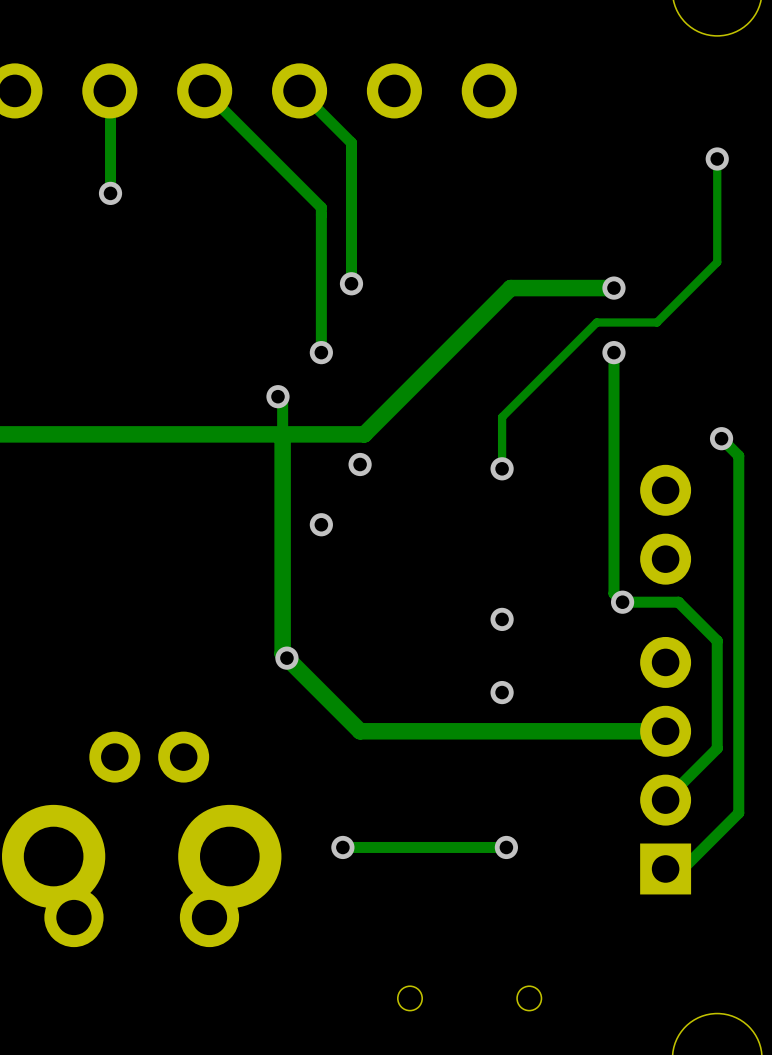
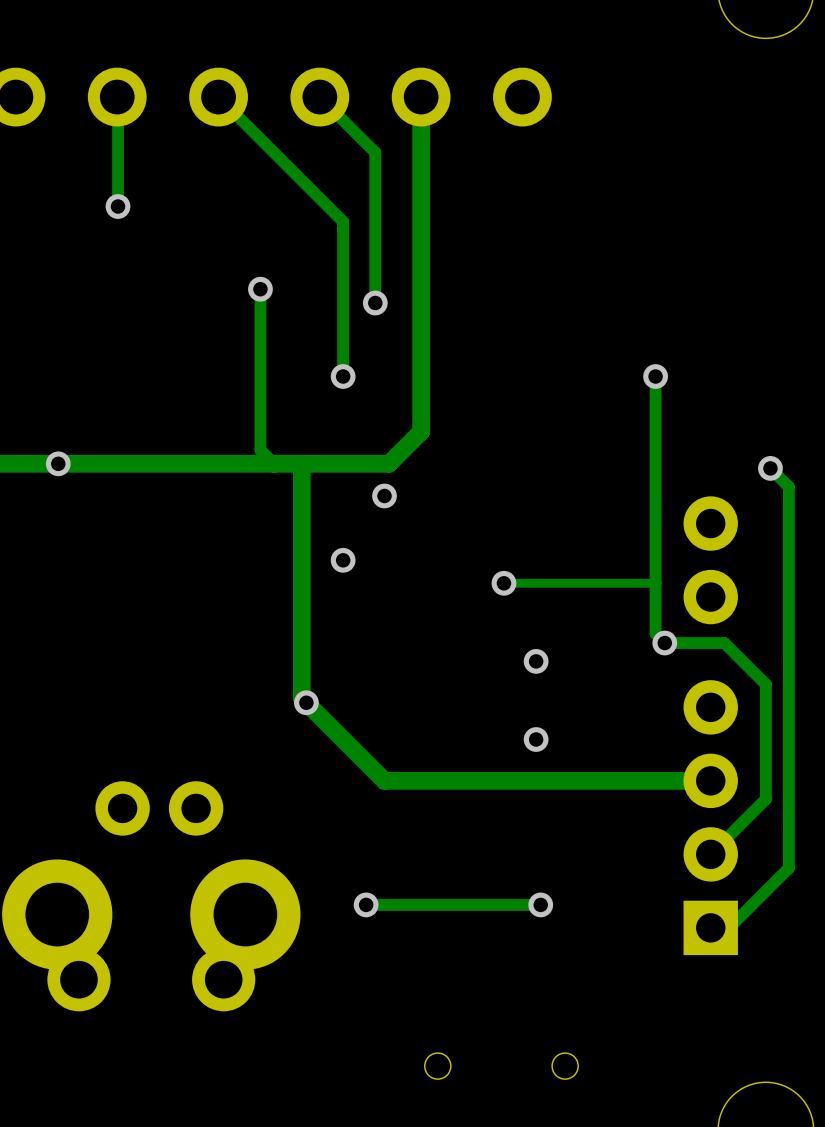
track: (717, 158) (717, 262) (657, 322) (596, 322) (502, 417) (502, 468) -> none
via: (717, 158) -> none
track: none -> (260, 289) (260, 450) (274, 463)
via: none -> (260, 289)
track: (613, 288) (510, 288) (394, 404) -> (421, 97) (421, 431)
via: (613, 288) -> none
track: (277, 396) (282, 401) (282, 434) -> none
via: (277, 396) -> none
via: none -> (58, 463)
via position: (502, 468) -> (503, 583)
track: none -> (655, 583) (503, 583)

